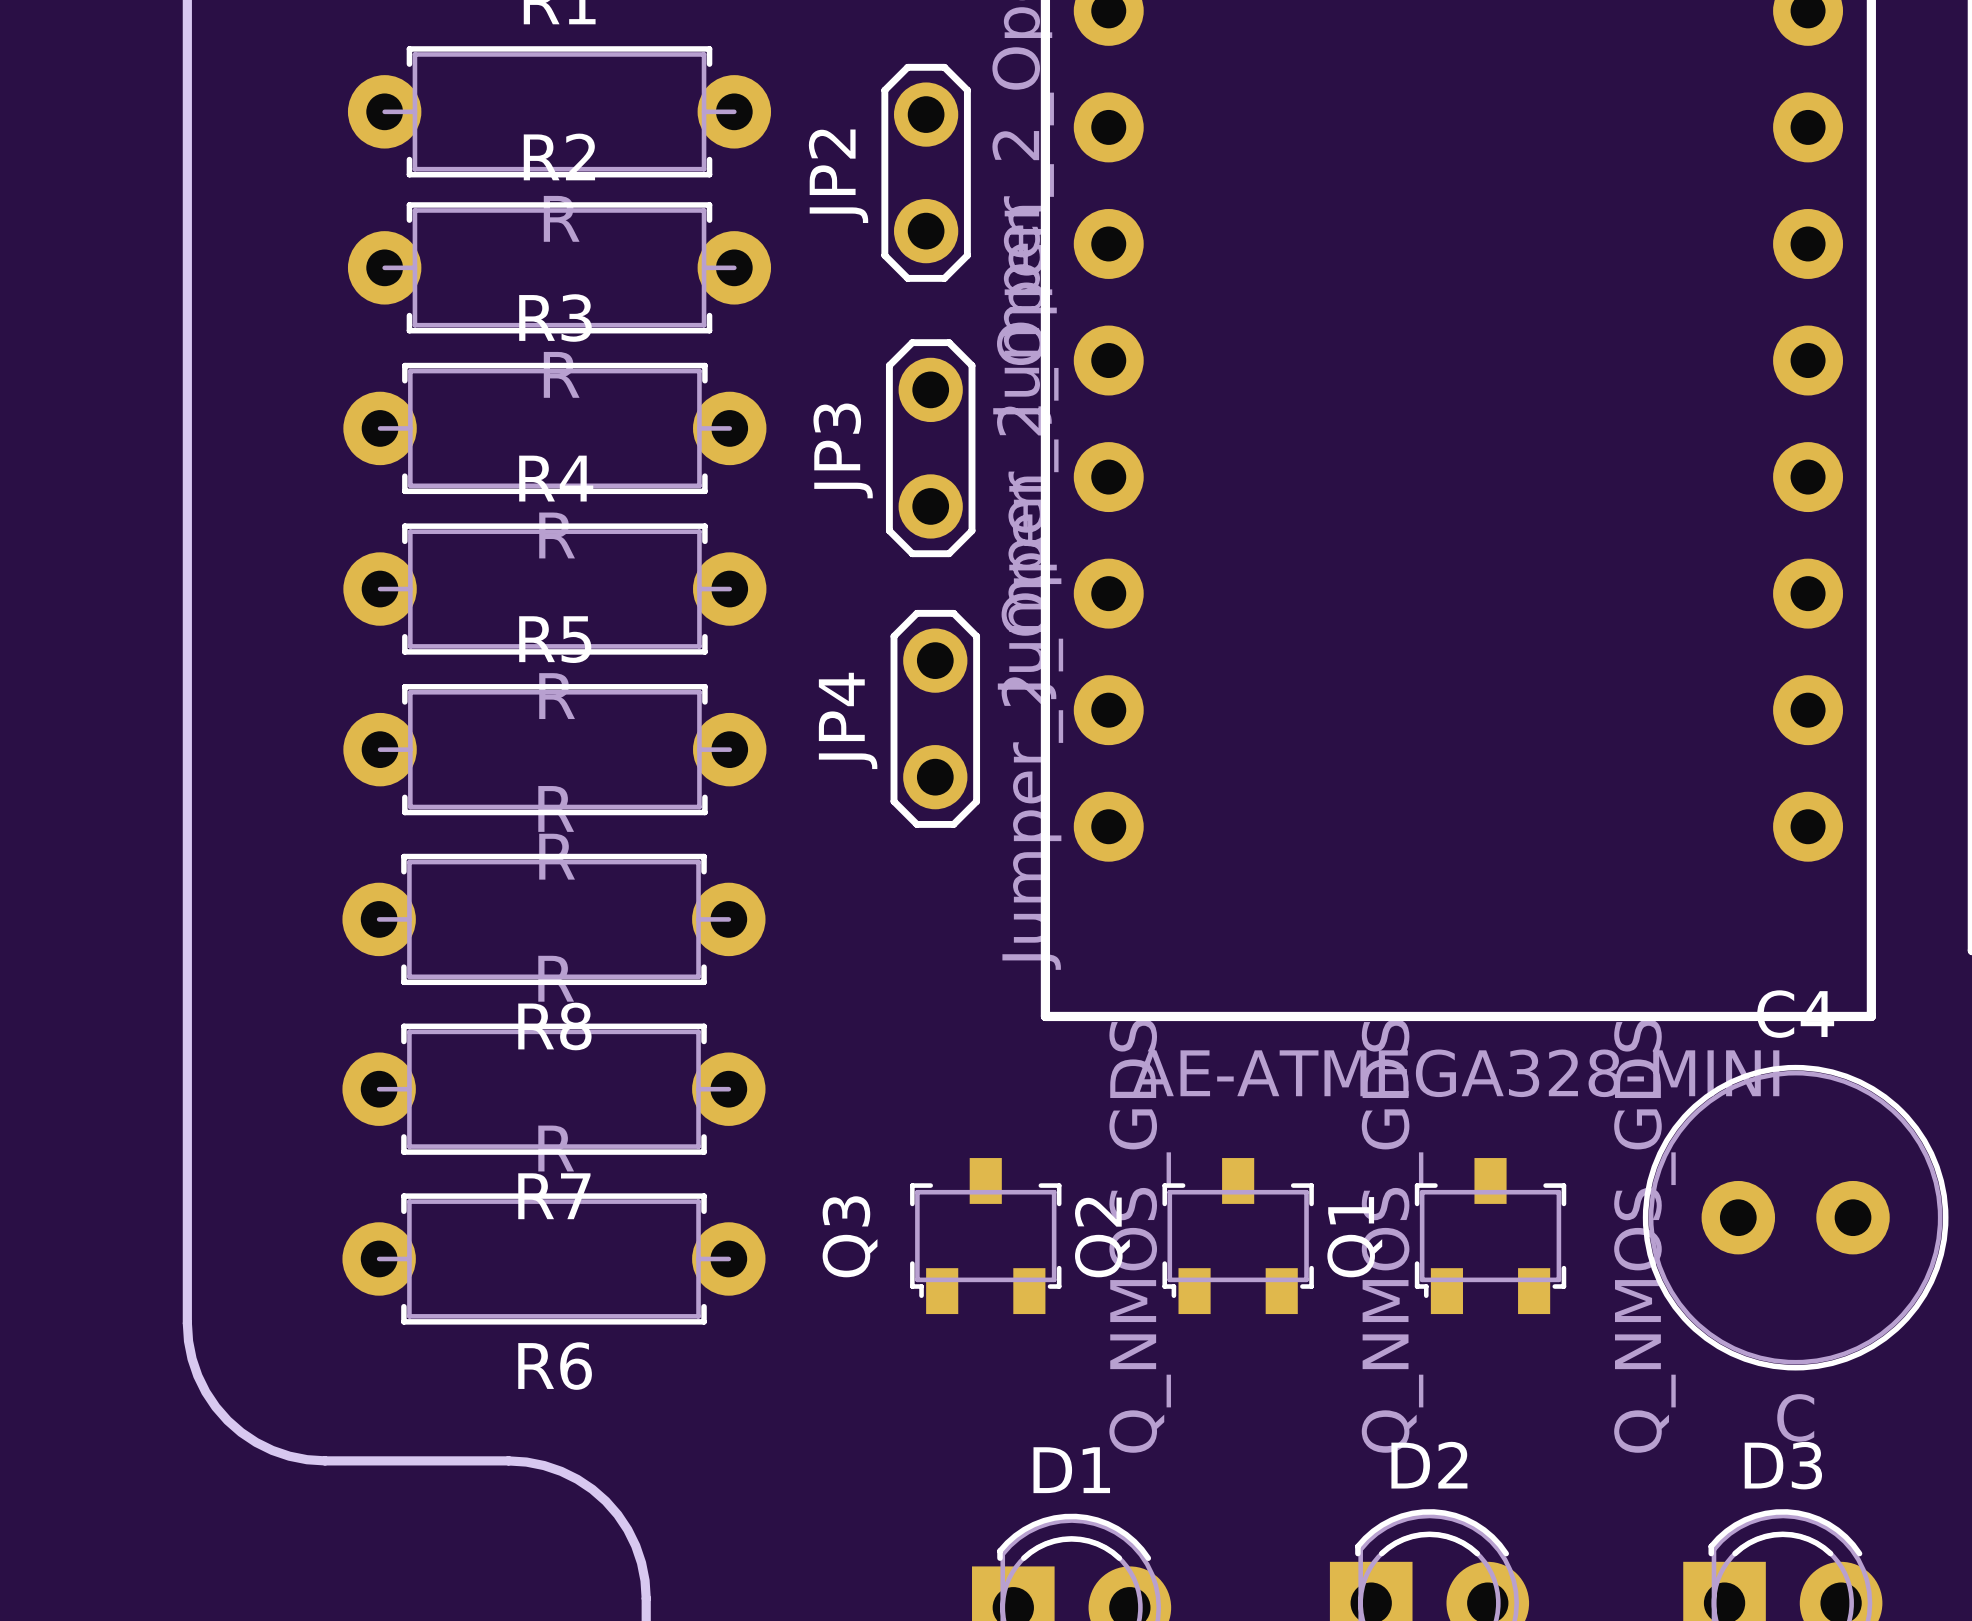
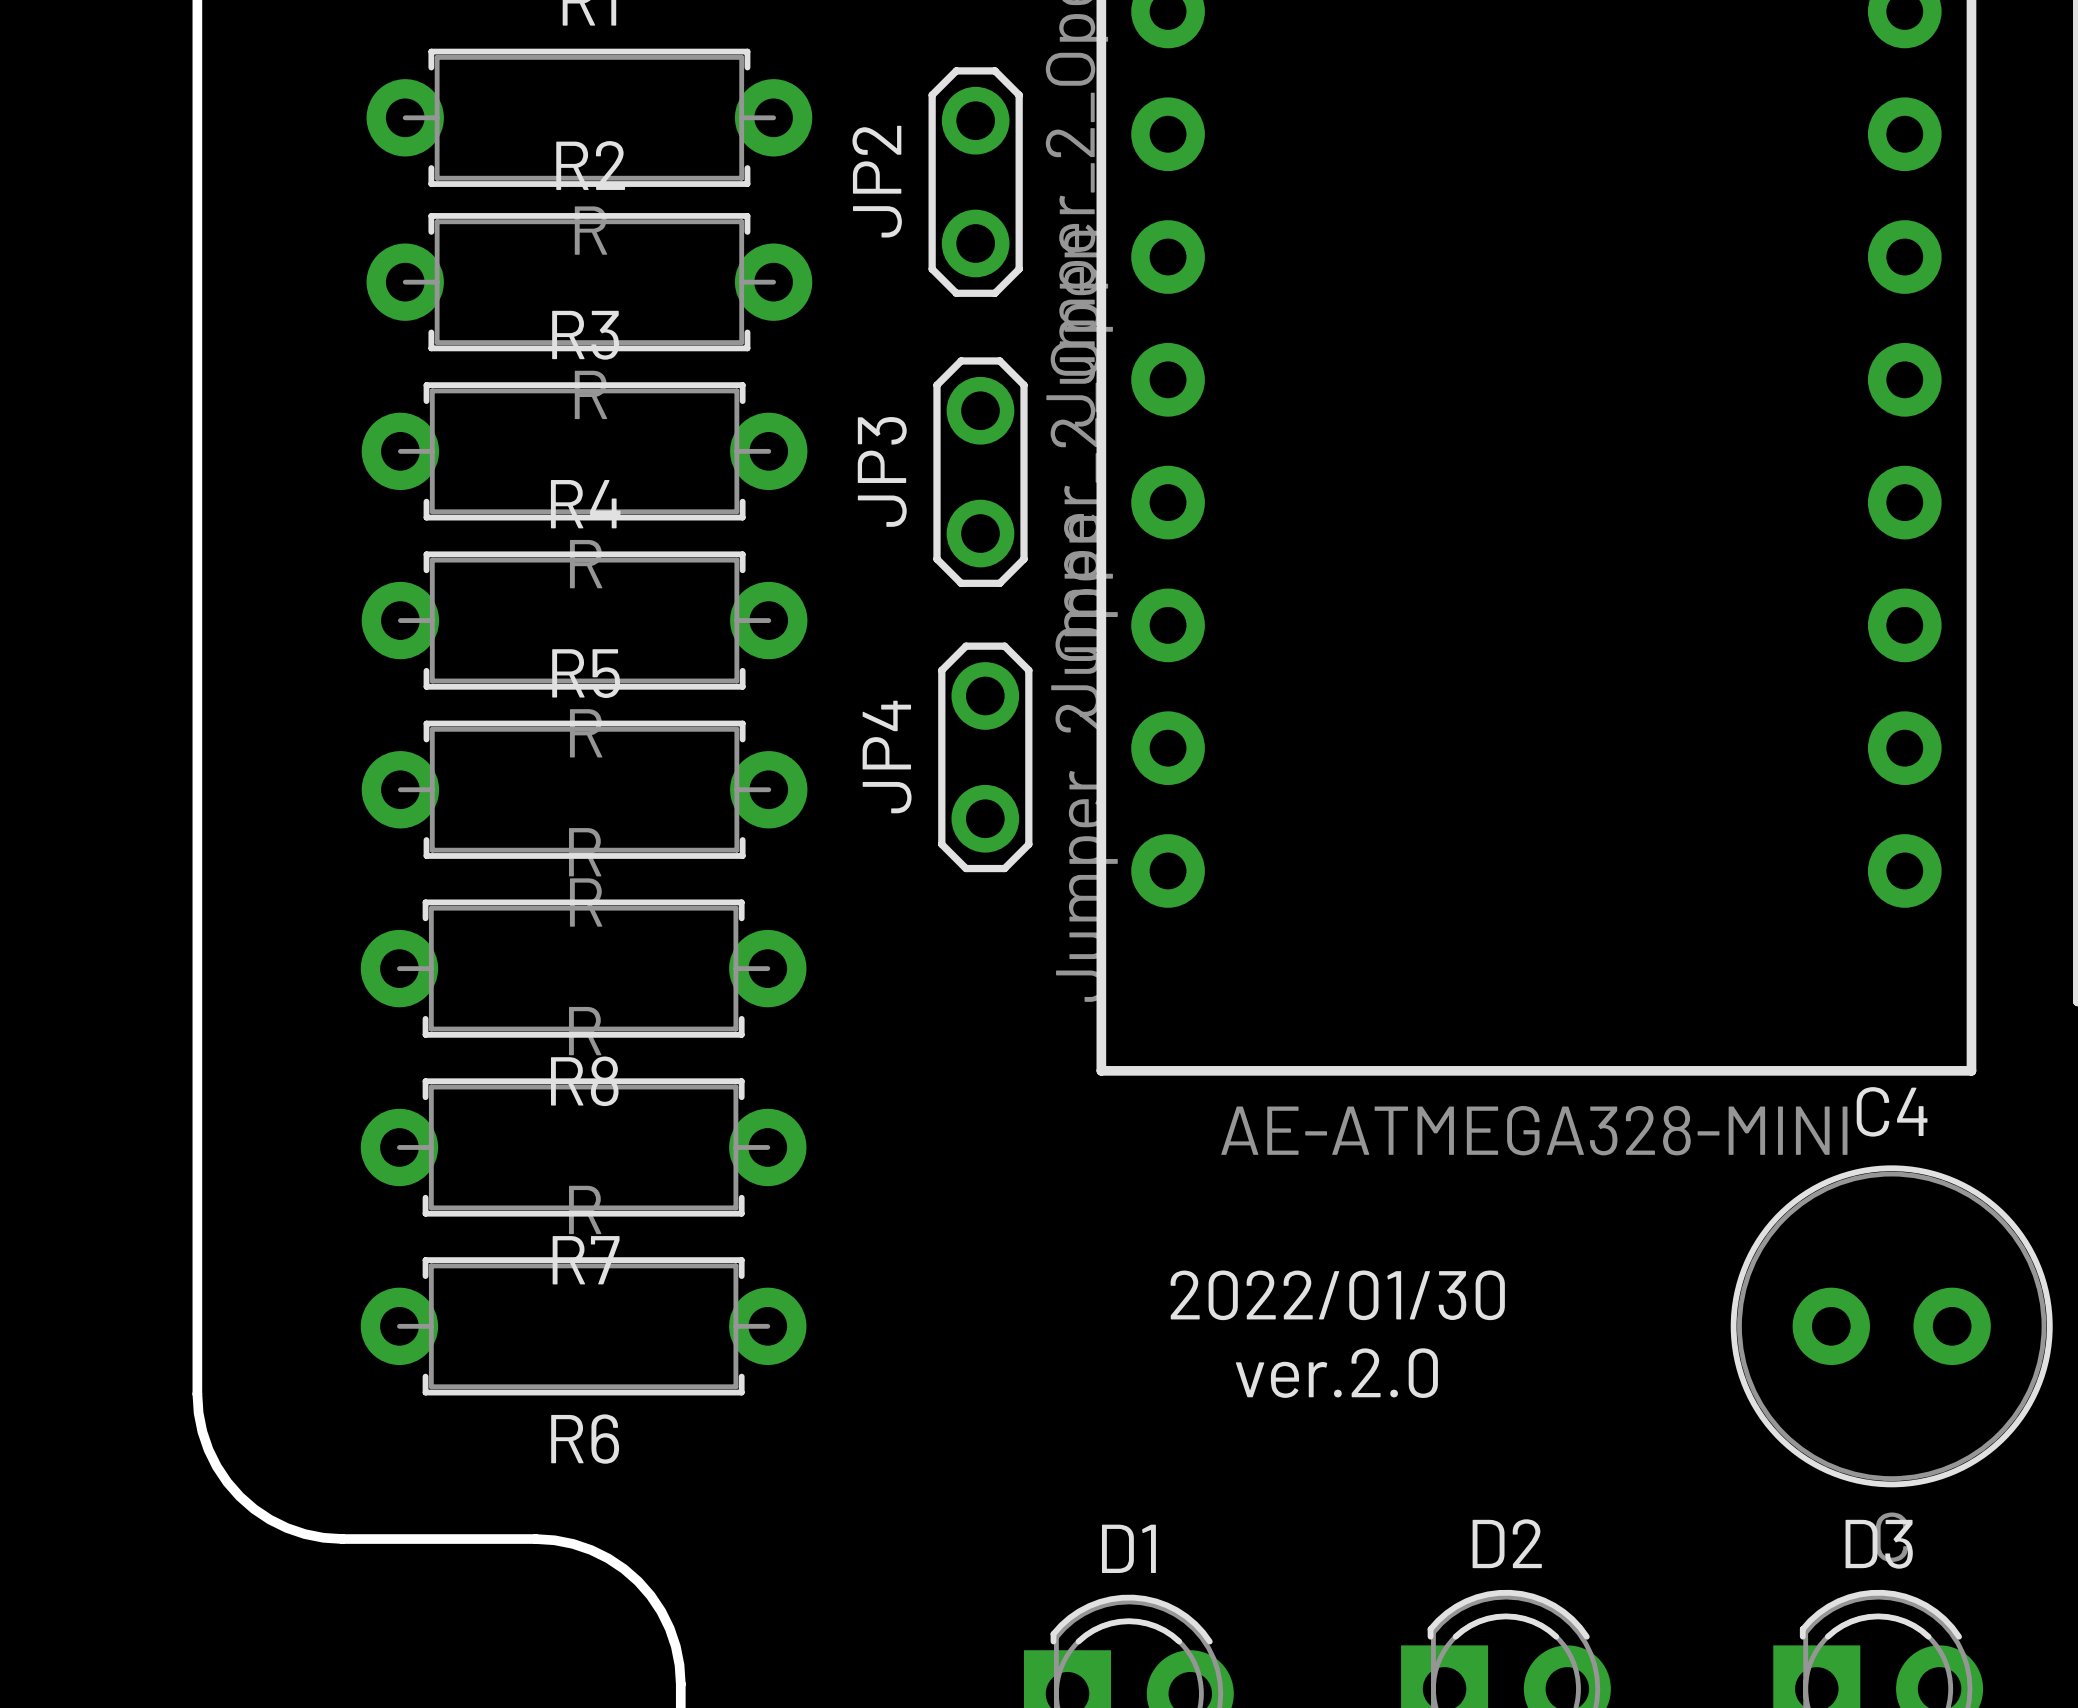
C4 position: (1795, 1217) -> (1891, 1326)
text: none -> 2022/01/30 (1337, 1295)
Q3: Q_NMOS_GDS (985, 1236) -> none
Q2: Q_NMOS_GDS (1238, 1236) -> none
Q1: Q_NMOS_GDS (1490, 1236) -> none
text: none -> ver.2.0 (1336, 1373)

